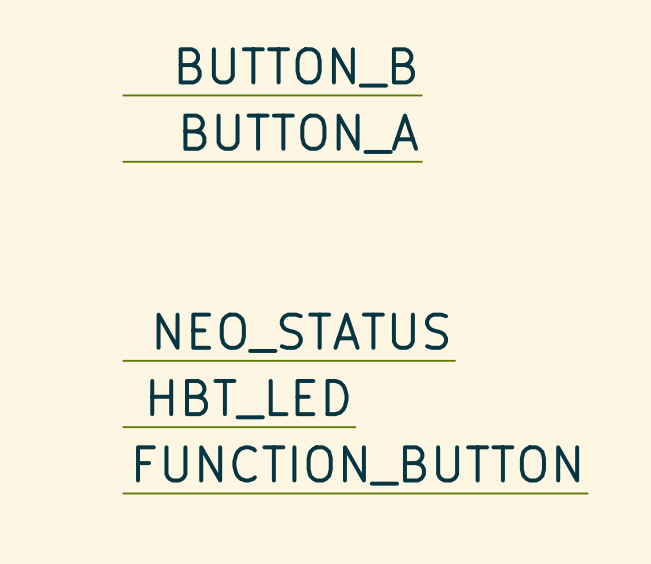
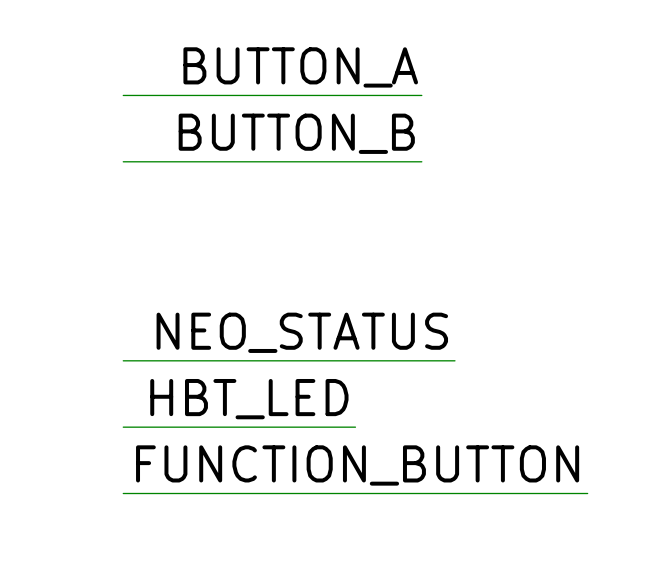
label: BUTTON_B (296, 67) -> BUTTON_A (300, 67)
label: BUTTON_A (300, 133) -> BUTTON_B (296, 133)

